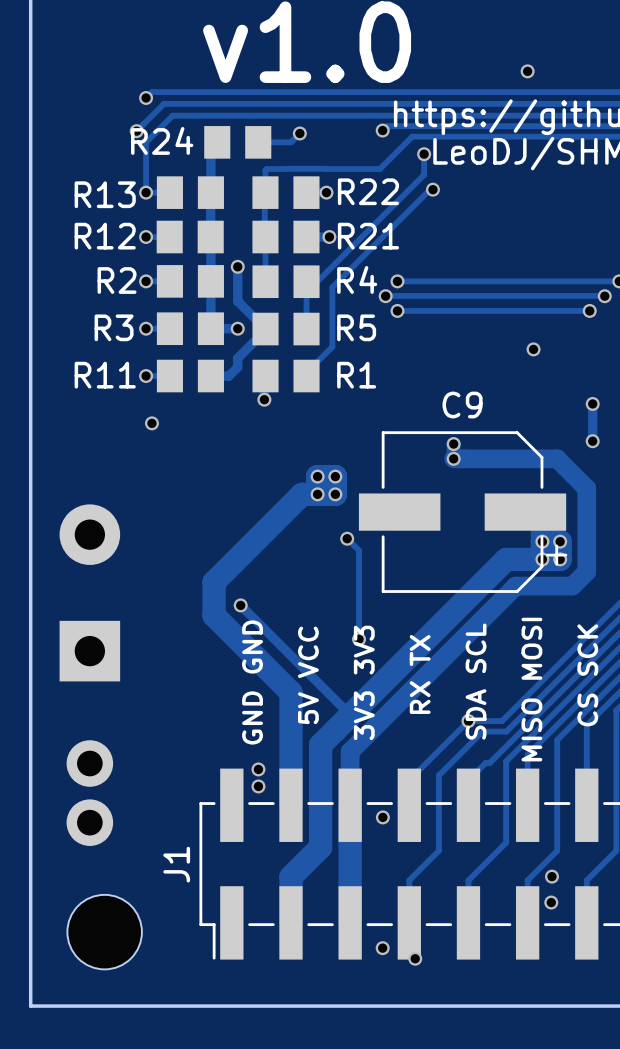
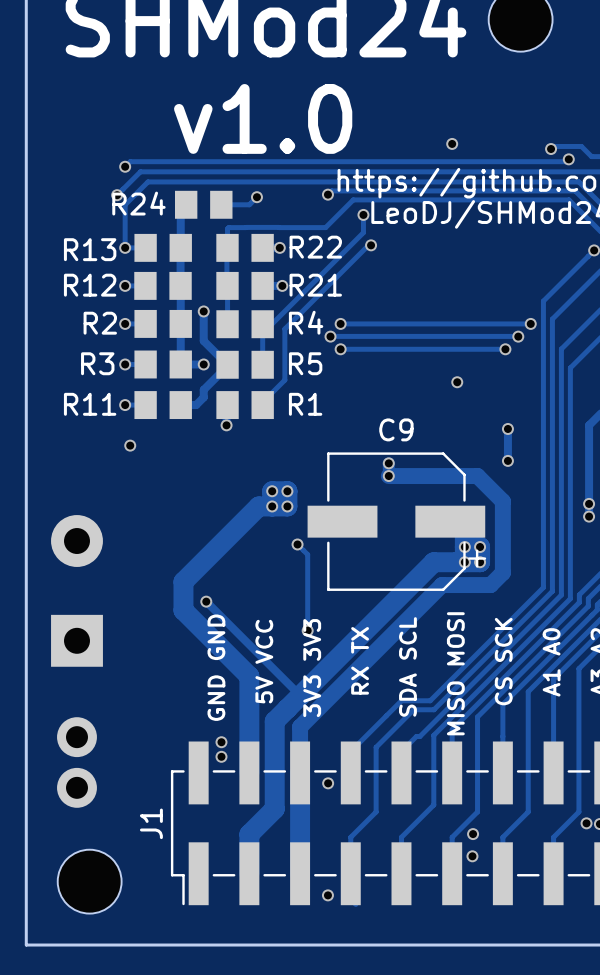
via: (468, 721) -> none
via: (415, 958) -> none

